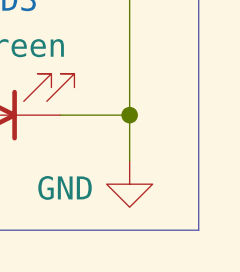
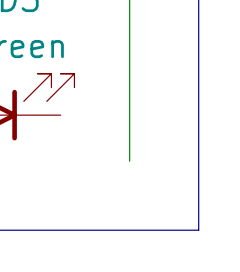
wire: (60, 115) (129, 115) -> none
junction: (129, 115) -> none
power symbol: GND (129, 184) -> none

